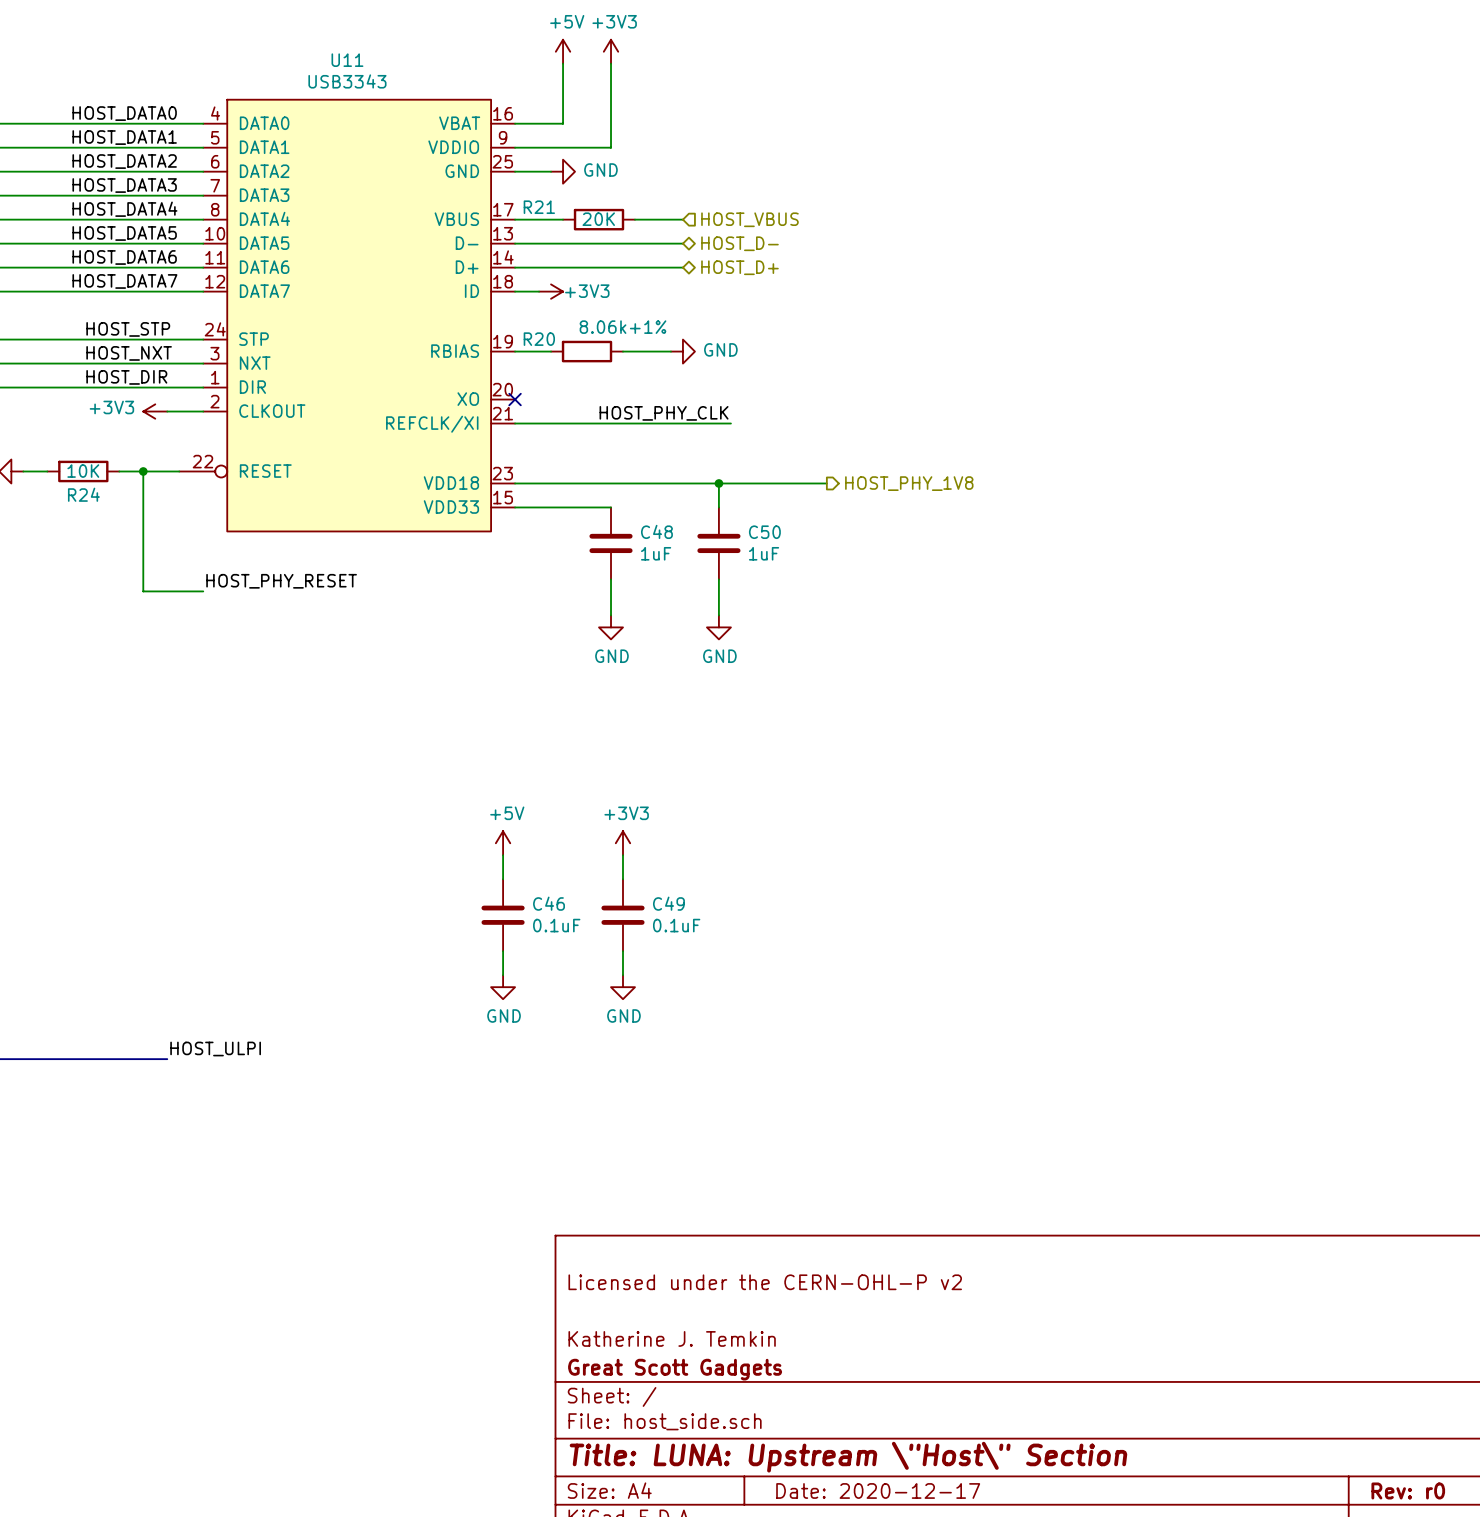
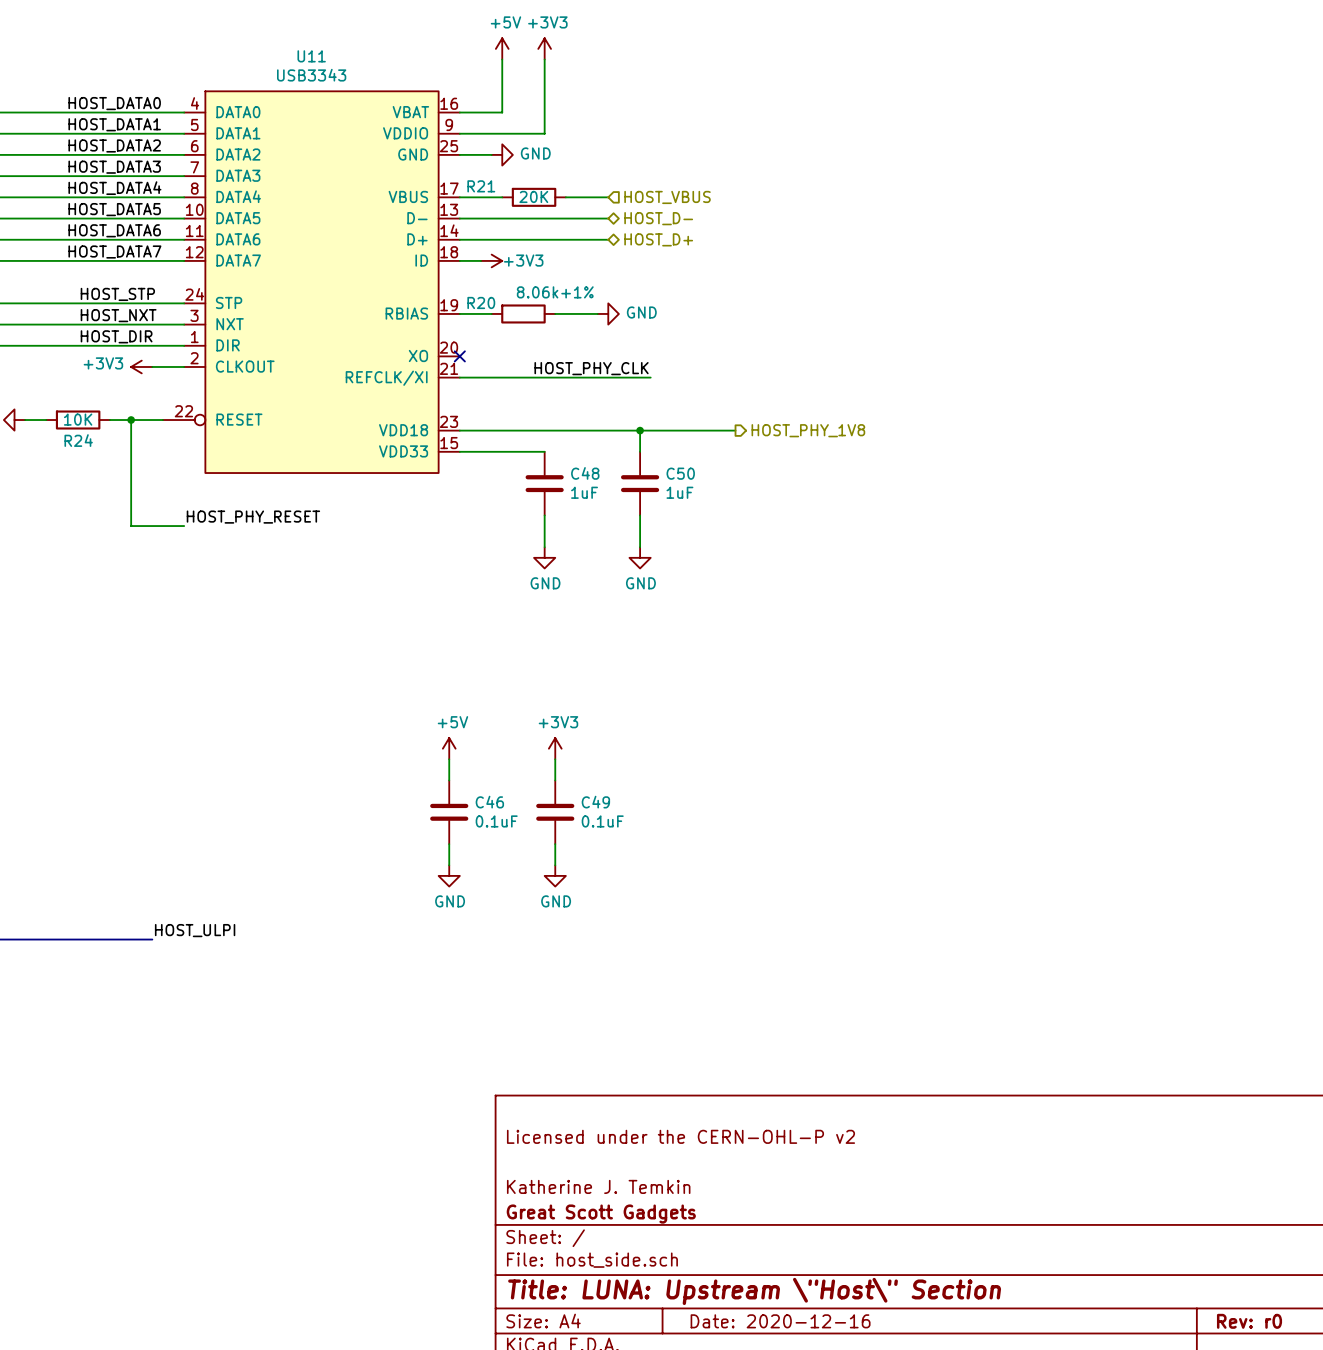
title block: Date: 2020-12-17 (878, 1490) -> Date: 2020-12-16 (780, 1321)

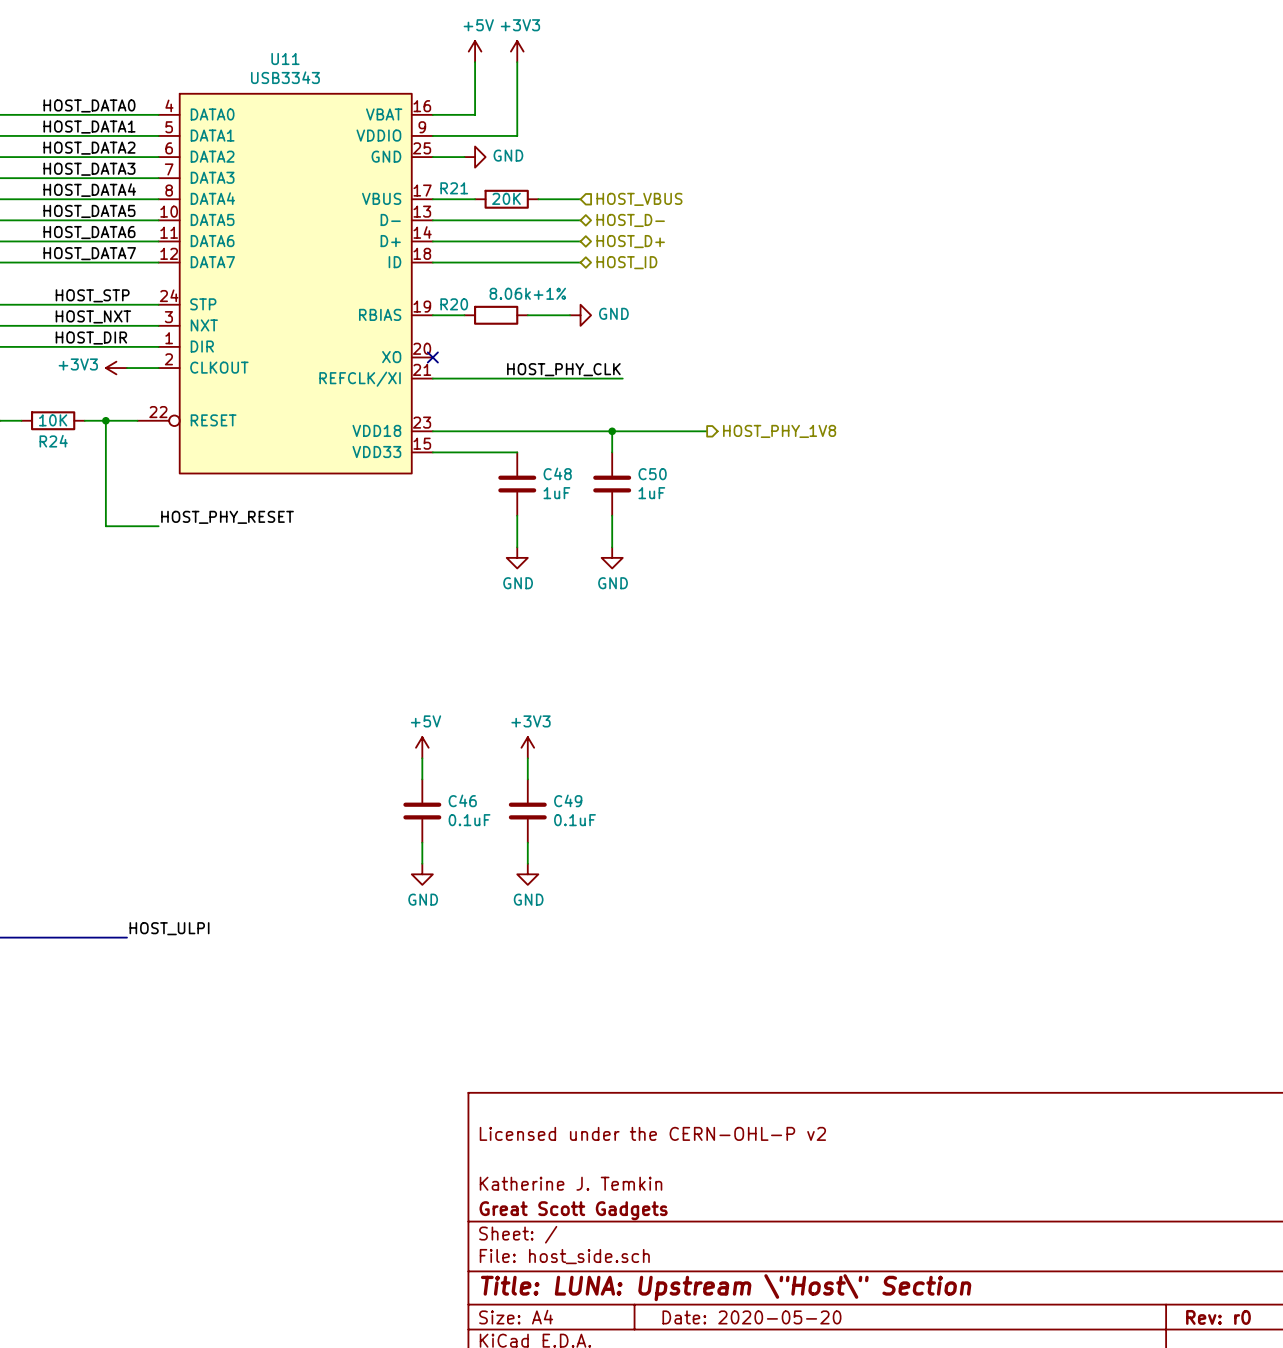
wire: none -> (453, 262) (580, 262)
power symbol: +3V3 (491, 260) -> none
hierarchical label: none -> HOST_ID (626, 262)
title block: Date: 2020-12-16 (780, 1321) -> Date: 2020-05-20 (751, 1317)

